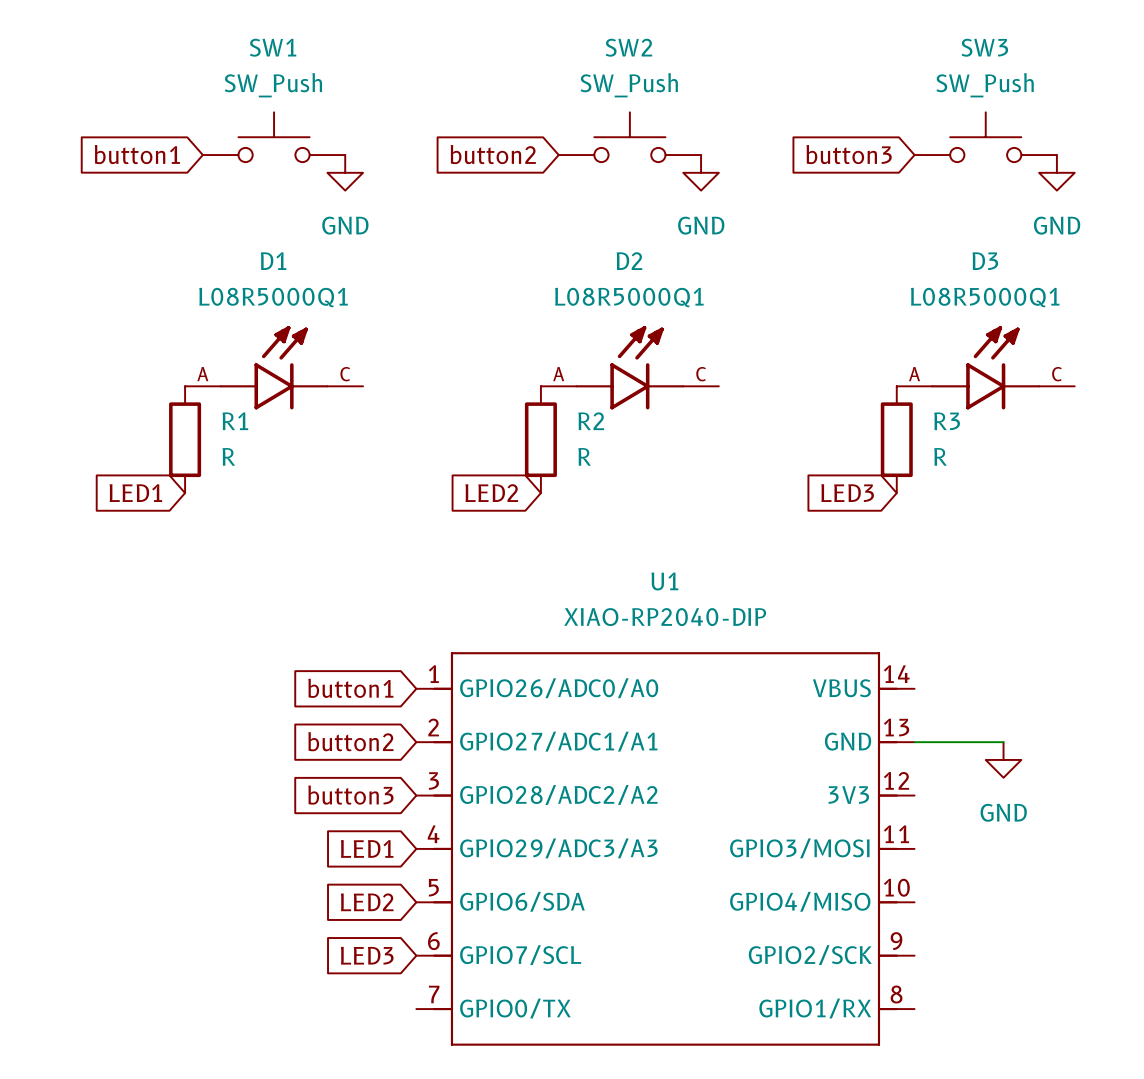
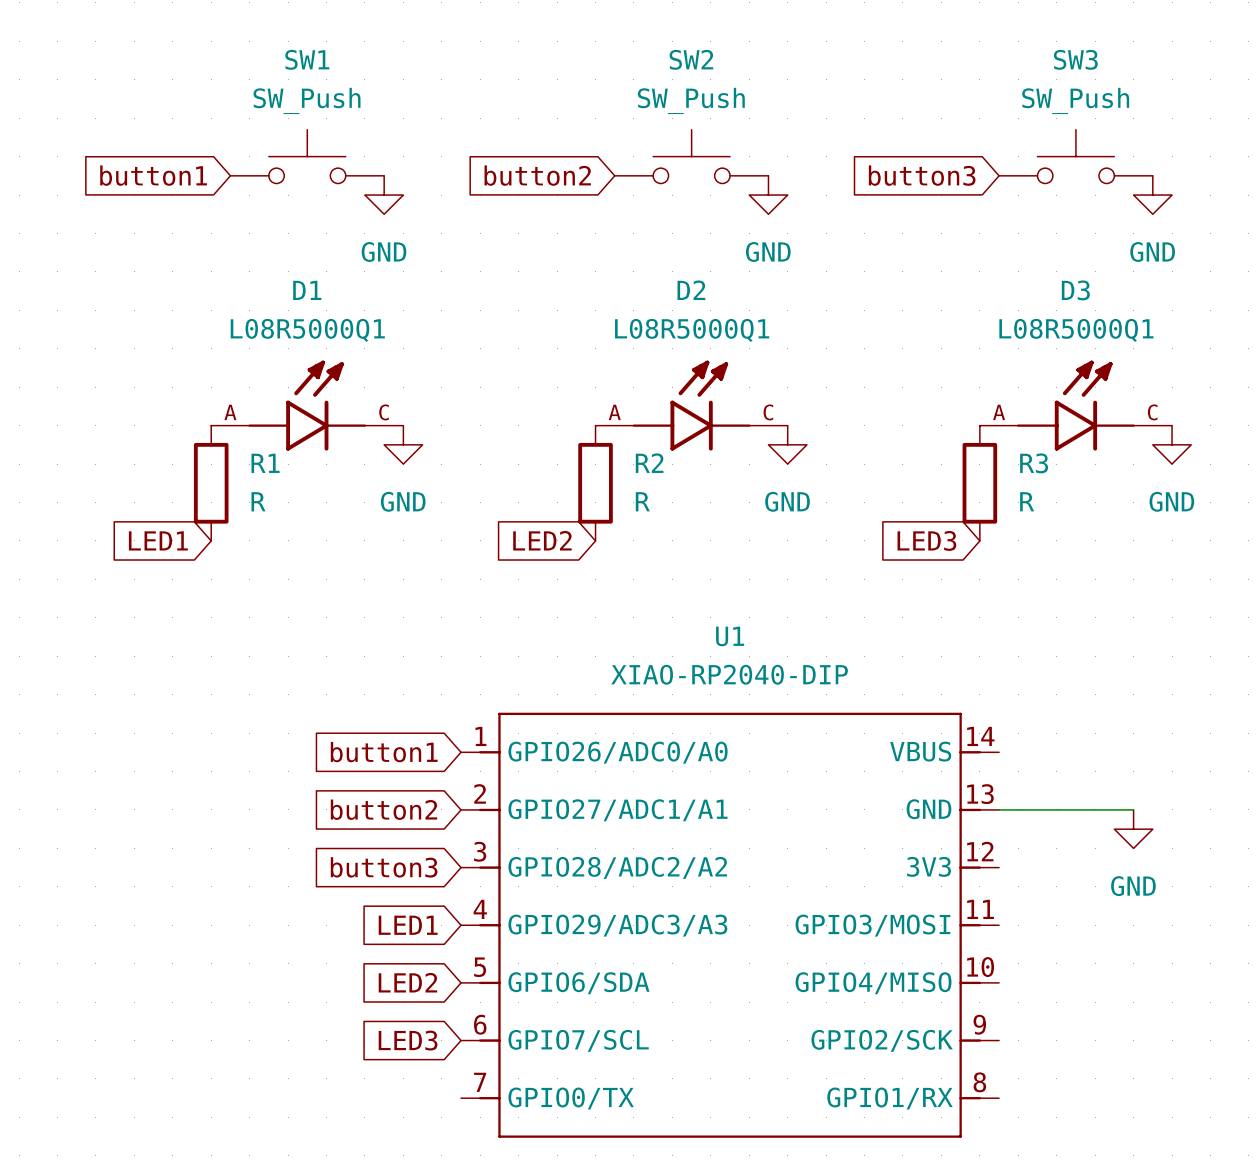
power symbol: none -> GND (403, 444)
power symbol: none -> GND (787, 444)
power symbol: none -> GND (1172, 444)
wire: none -> (1095, 809) (1133, 809)
power symbol position: GND (1003, 759) -> GND (1133, 829)

